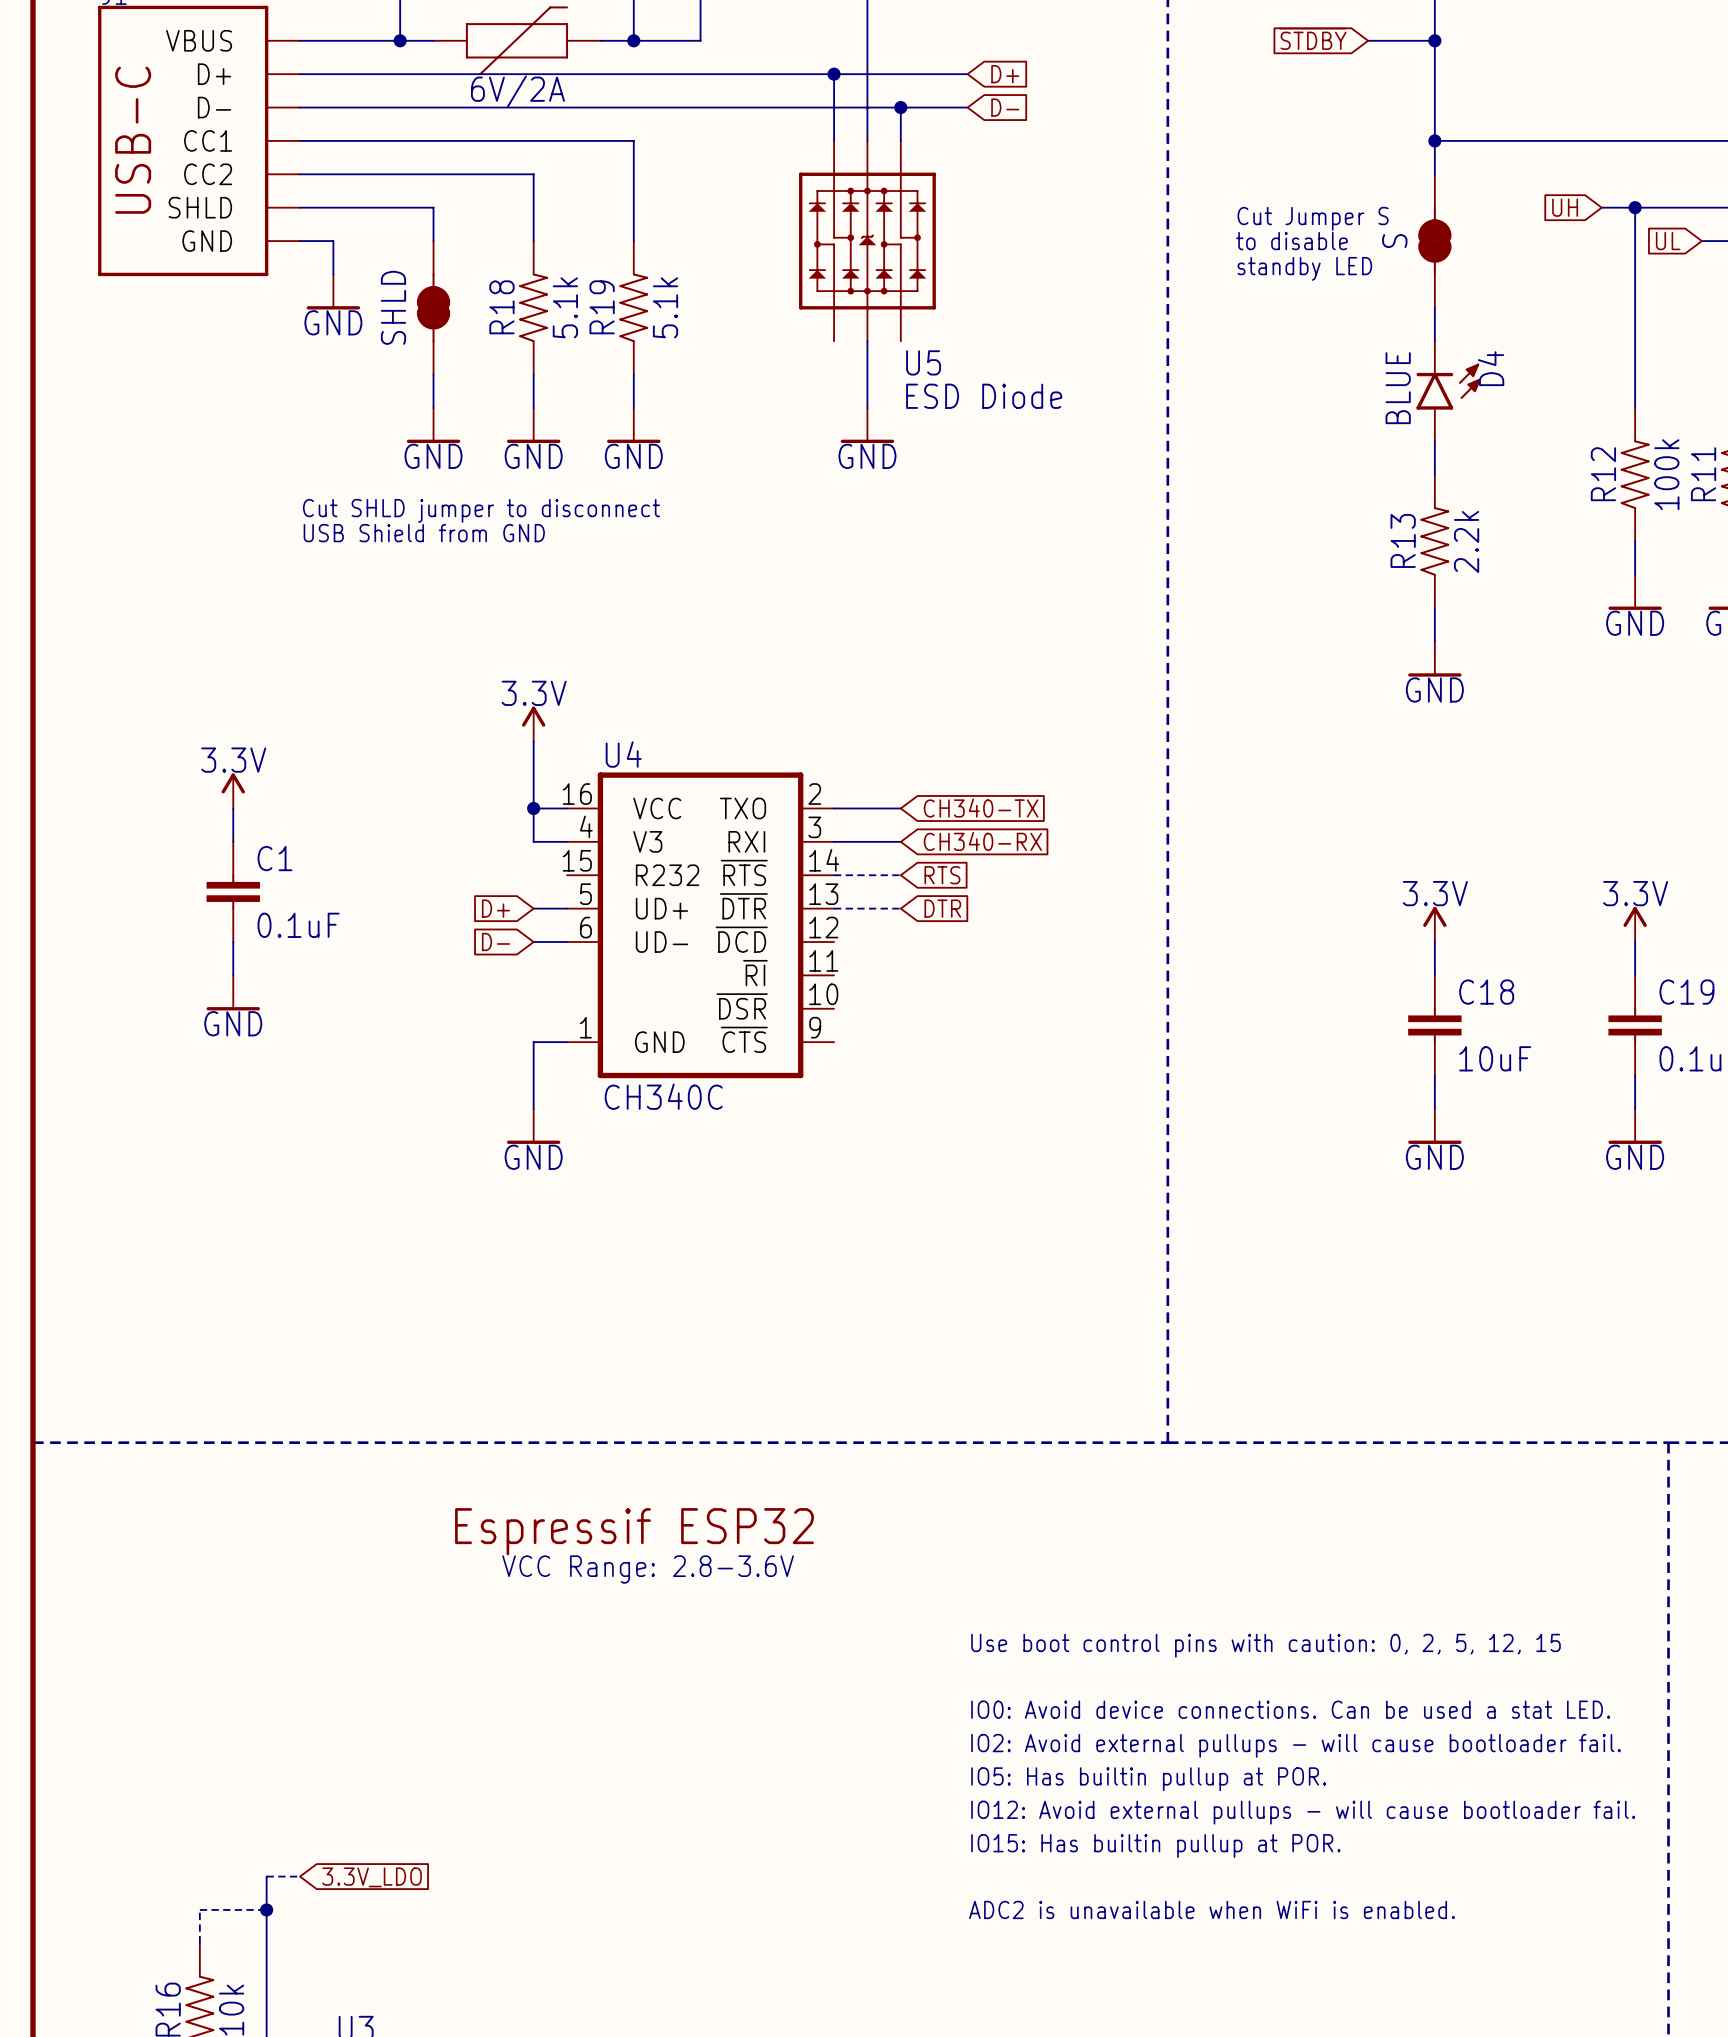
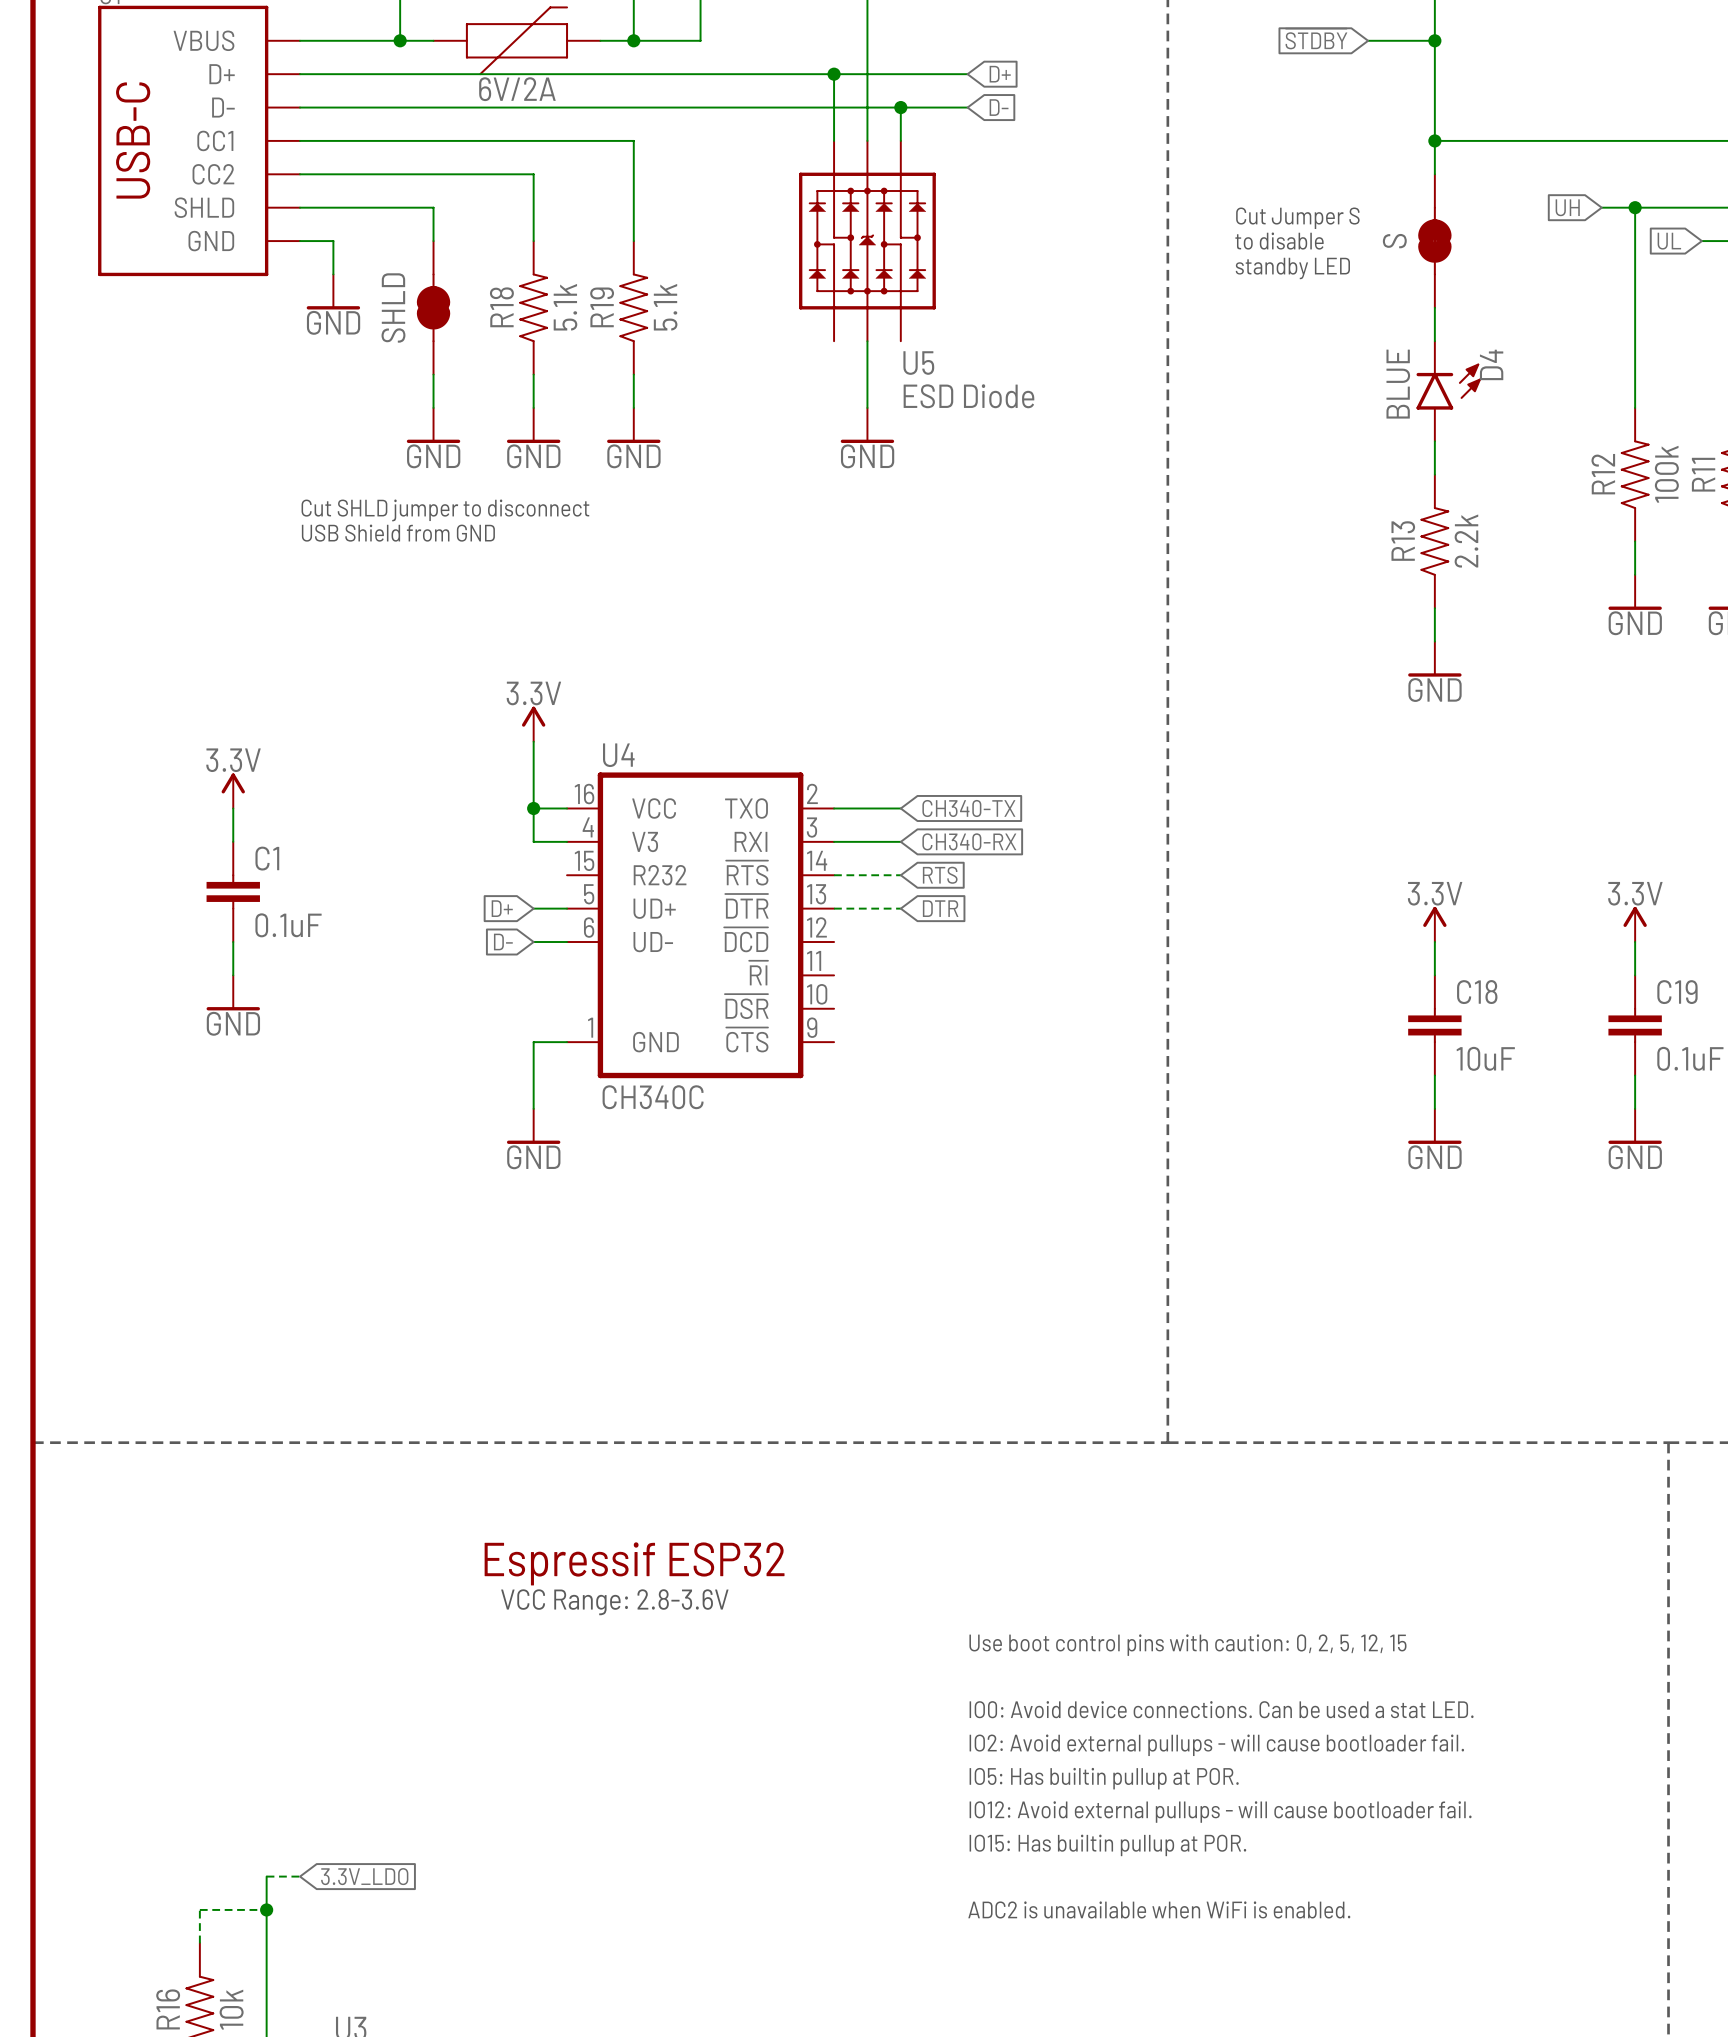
text position: Espressif ESP32 (634, 1531) -> Espressif ESP32 (634, 1563)
text position: VCC Range: 2.8-3.6V (648, 1569) -> VCC Range: 2.8-3.6V (614, 1602)

